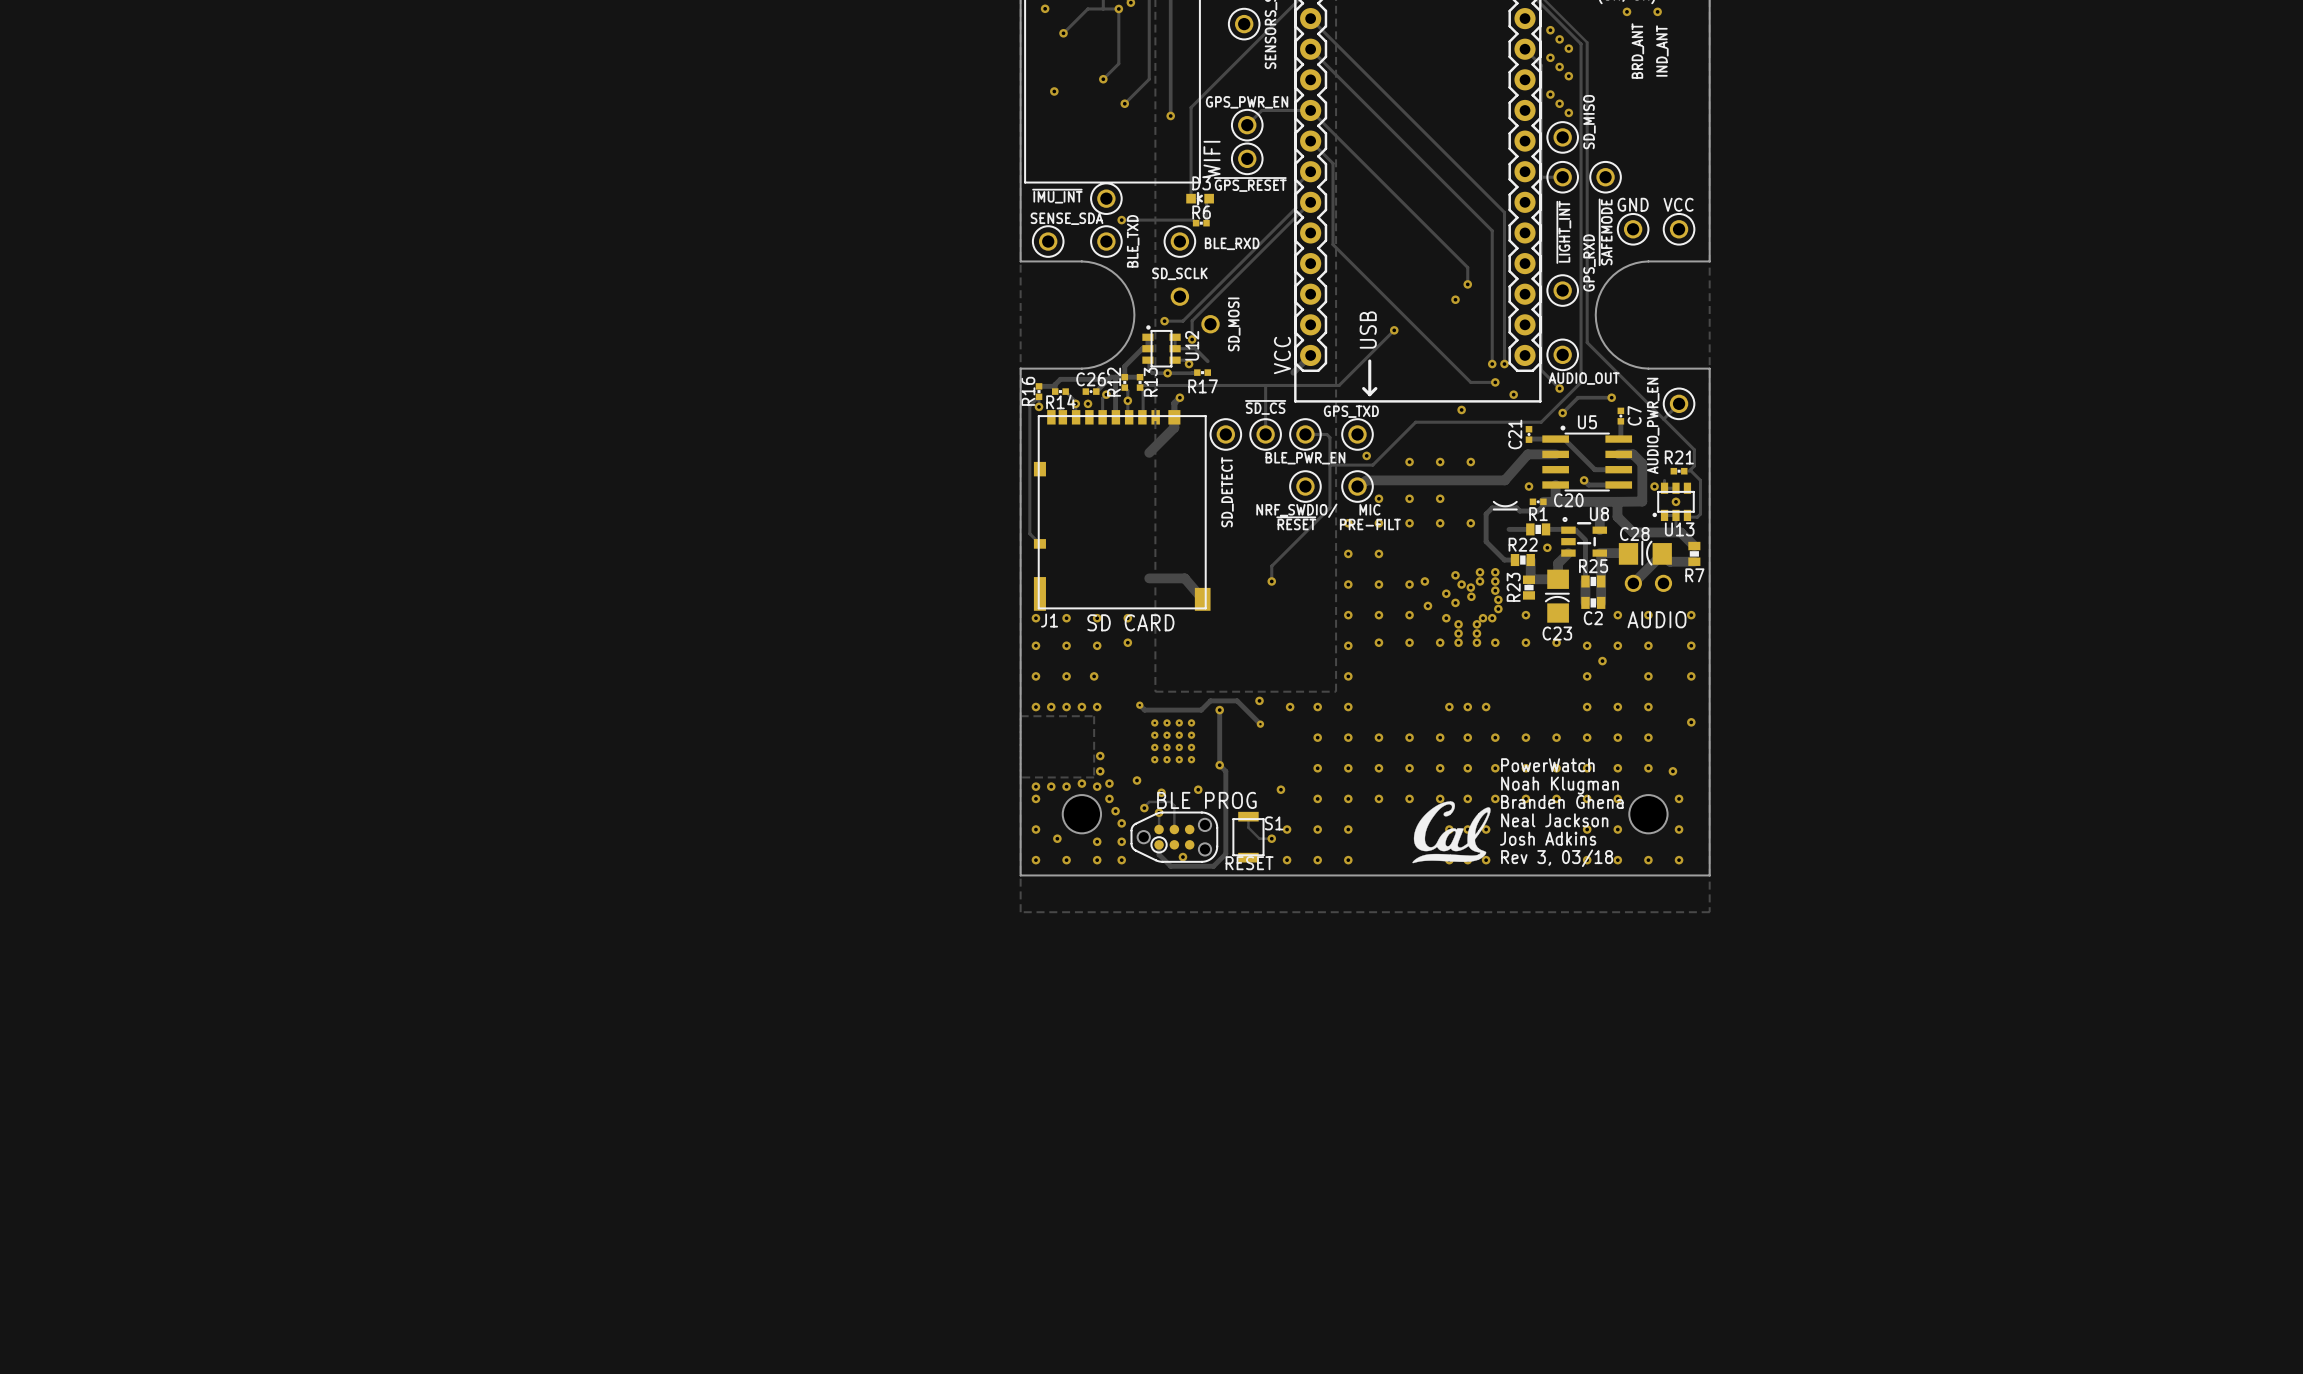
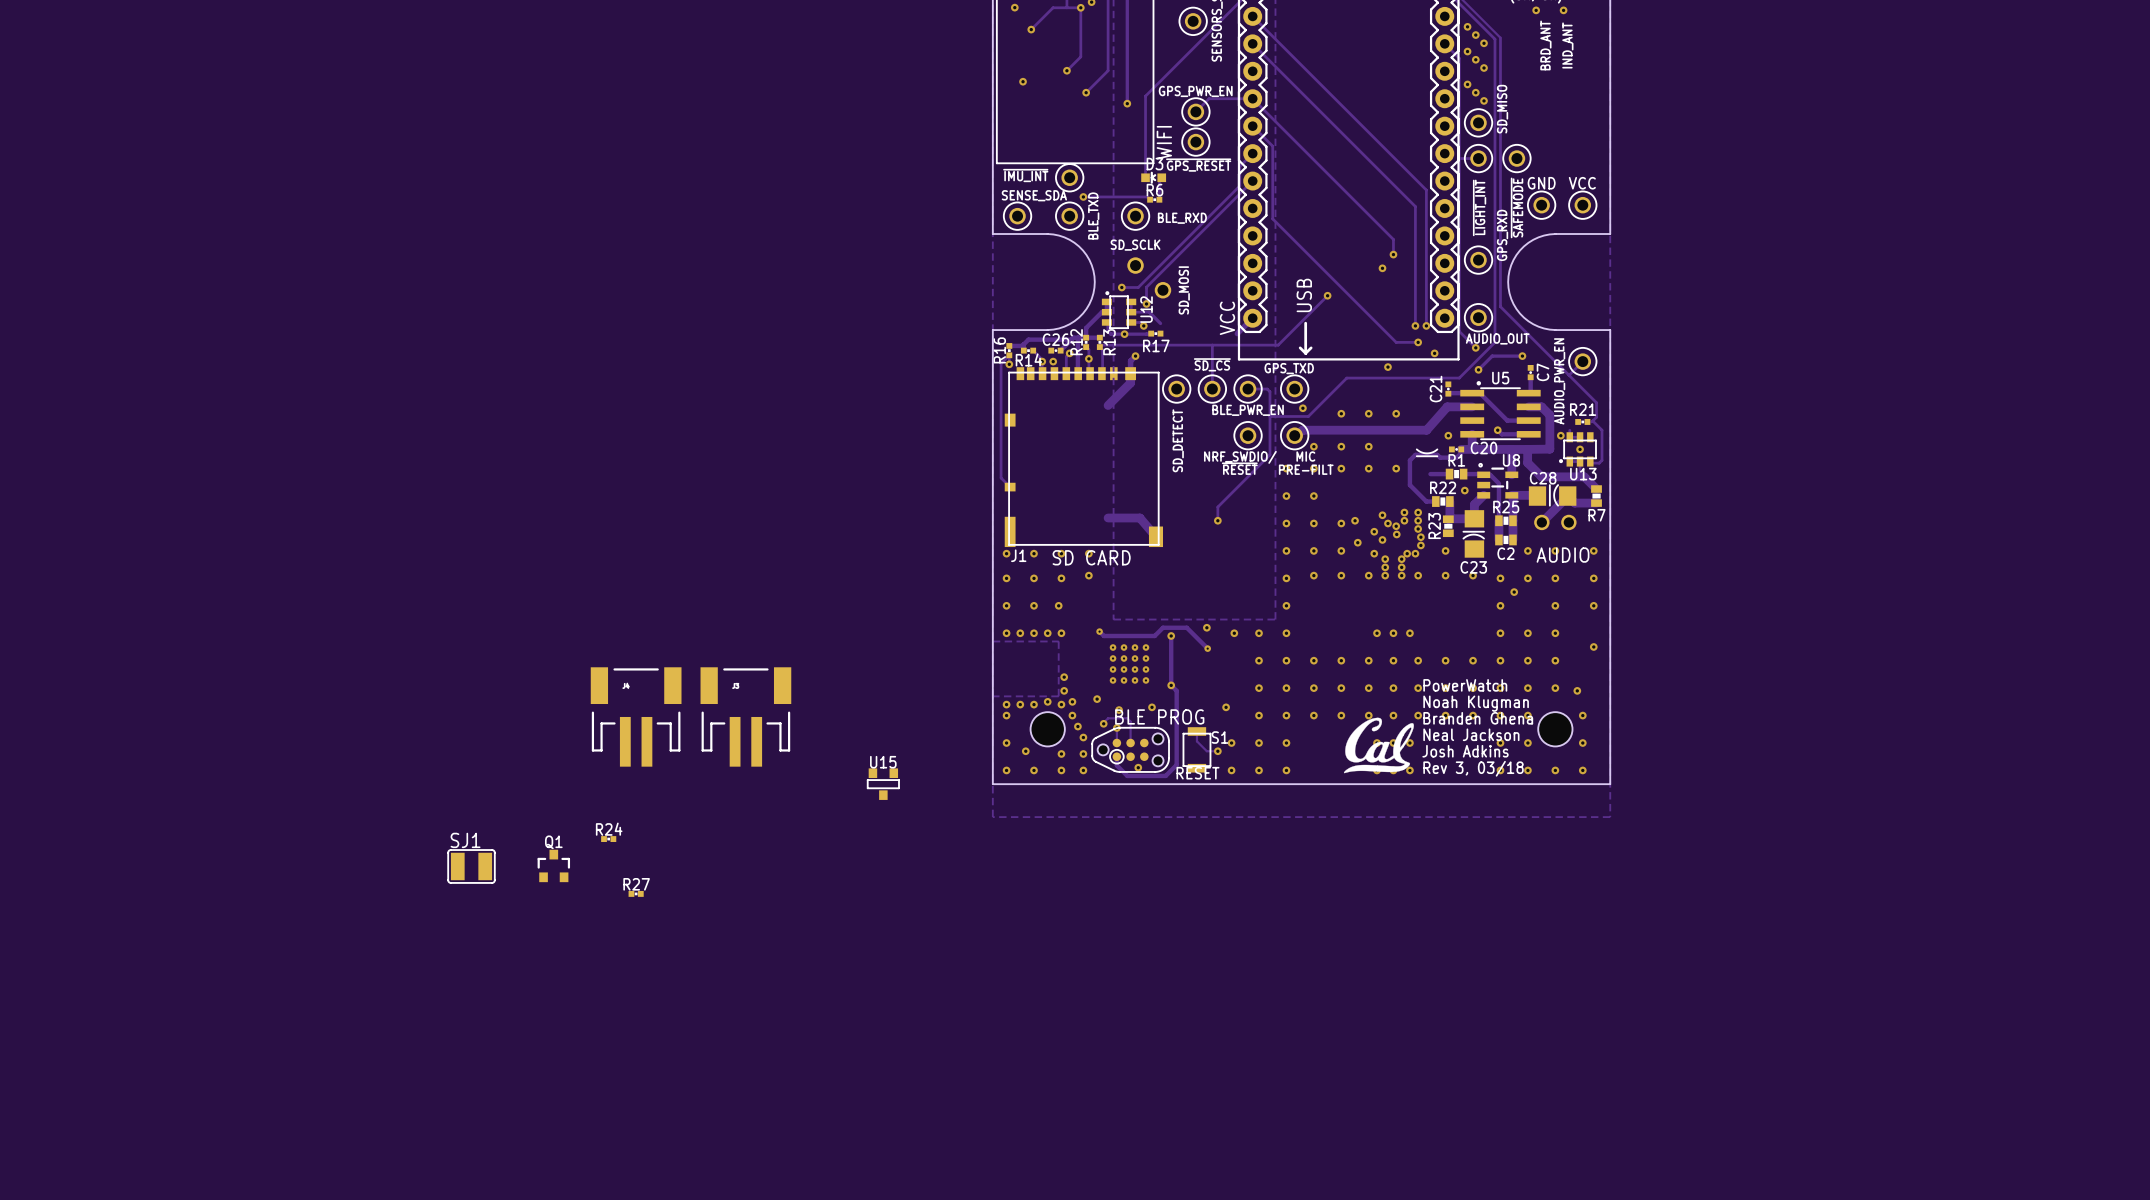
part: none -> (636, 716)
part: none -> (745, 716)
U15: none -> (883, 784)
R24: none -> (608, 839)
Q1: none -> (553, 865)
SJ1: none -> (471, 866)
R27: none -> (636, 893)

